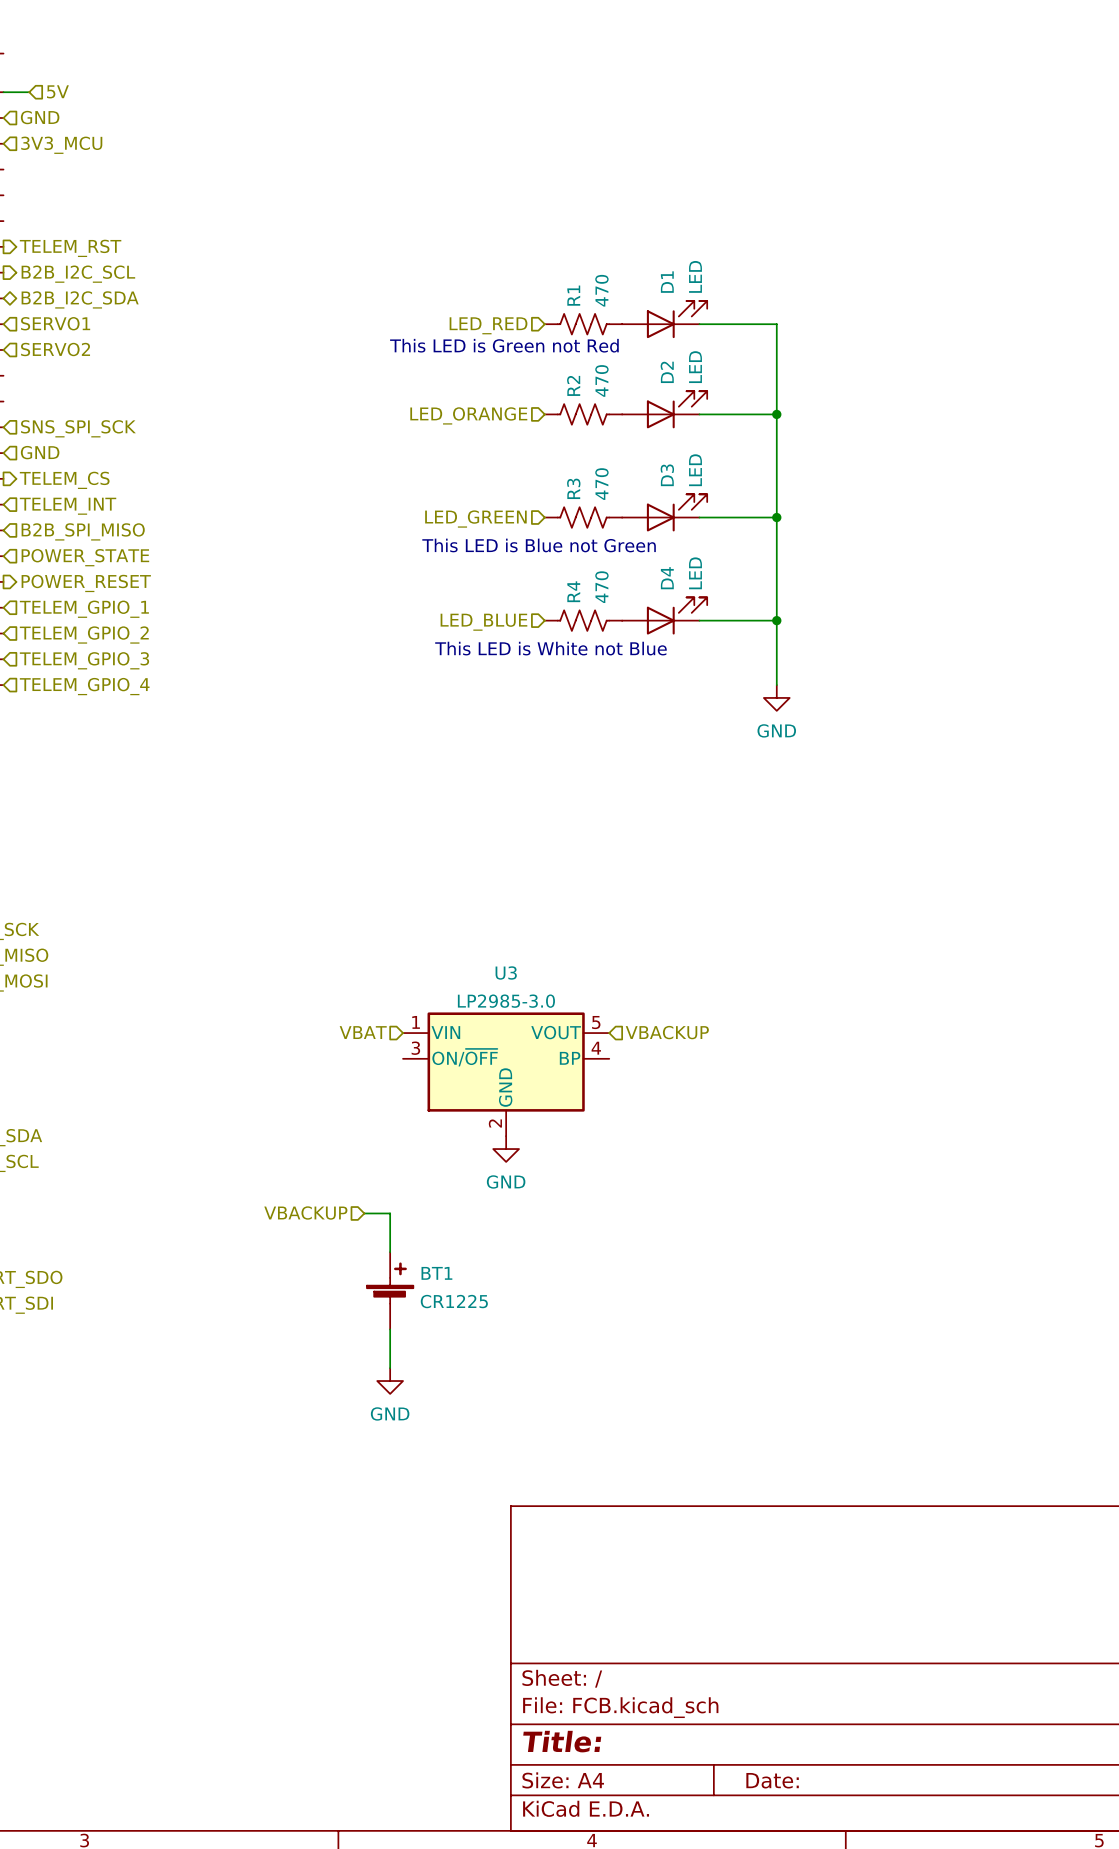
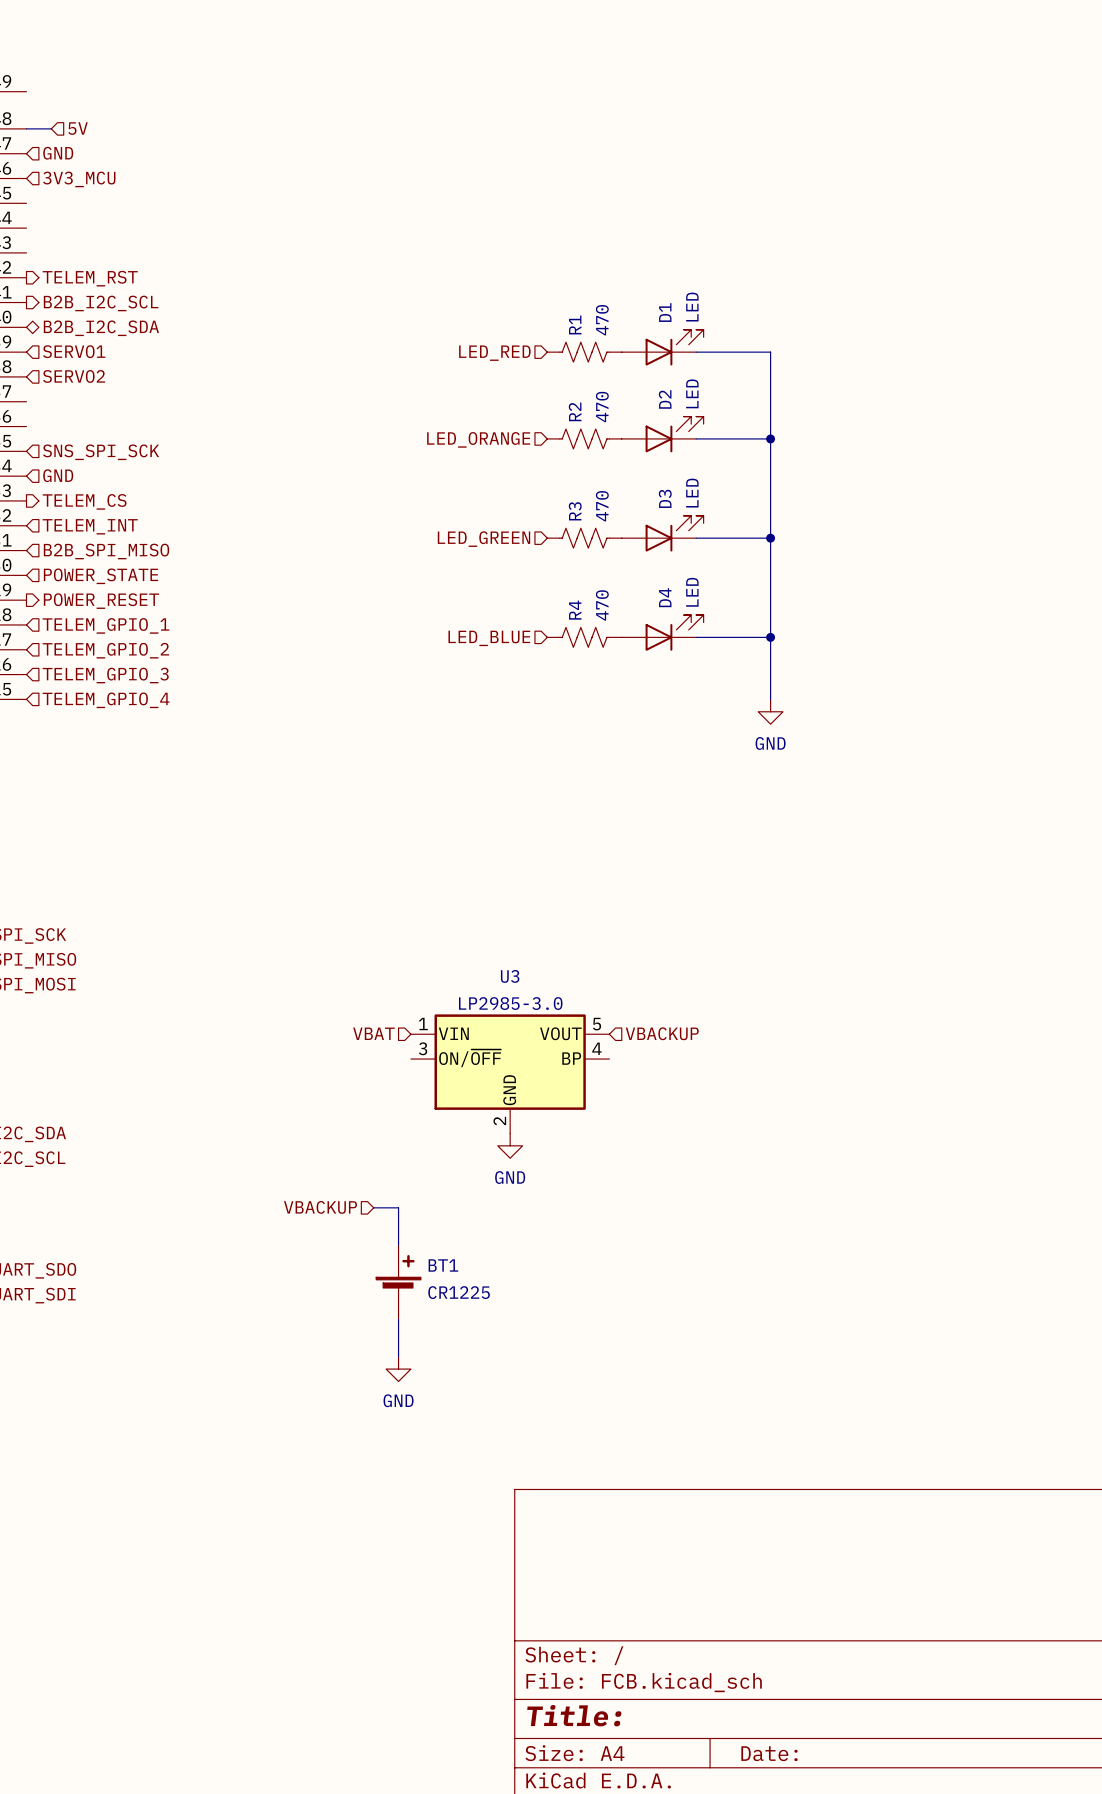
text: This LED is Green not Red (504, 345) -> none
text: This LED is Blue not Green (539, 545) -> none
text: This LED is White not Blue (550, 648) -> none

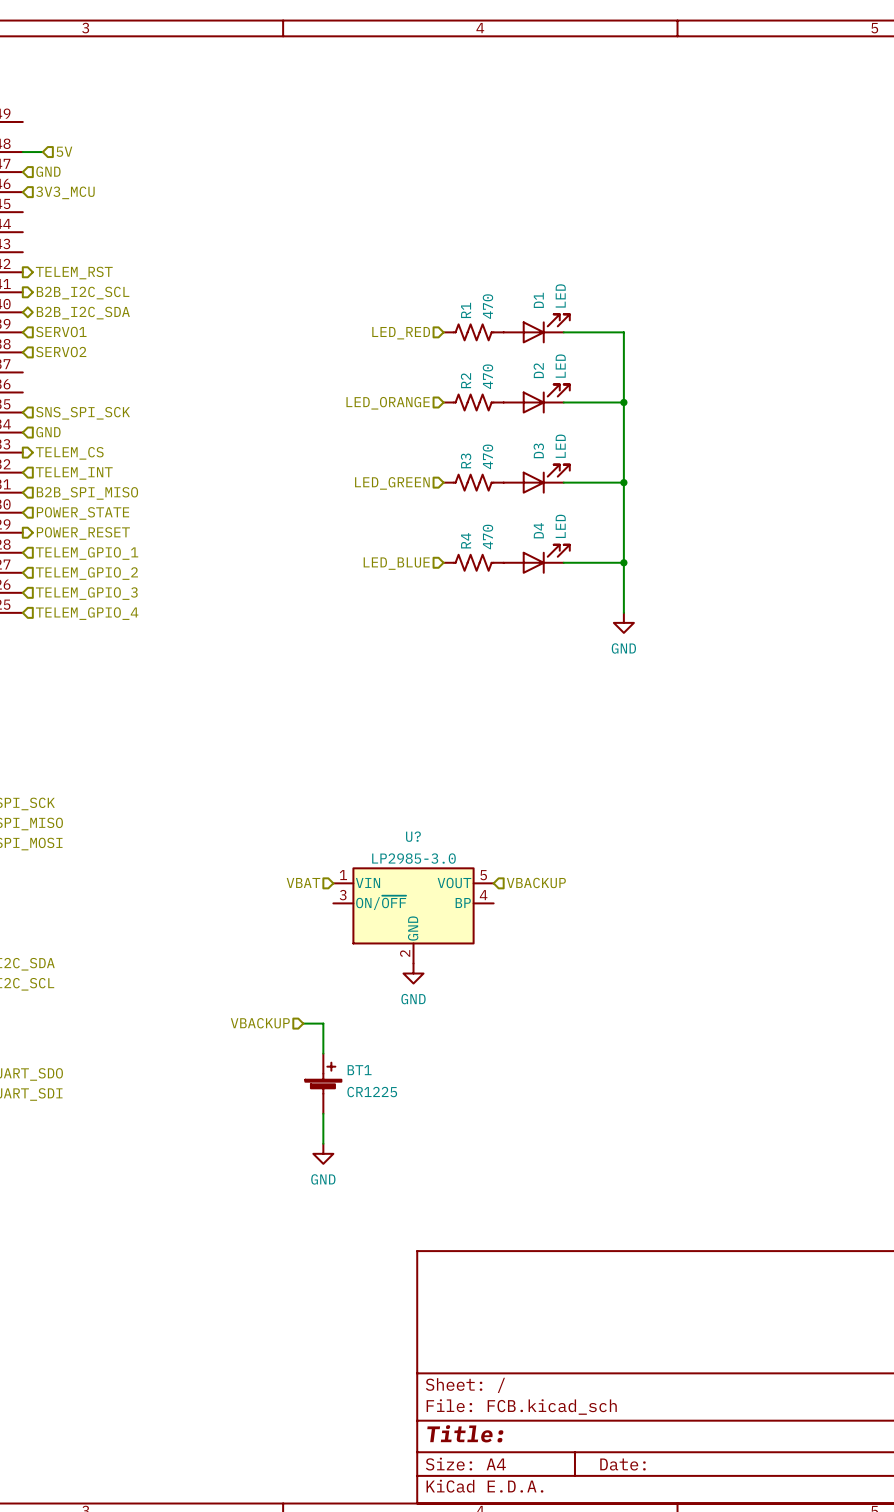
U3 name: U3 (510, 976) -> U? (413, 836)

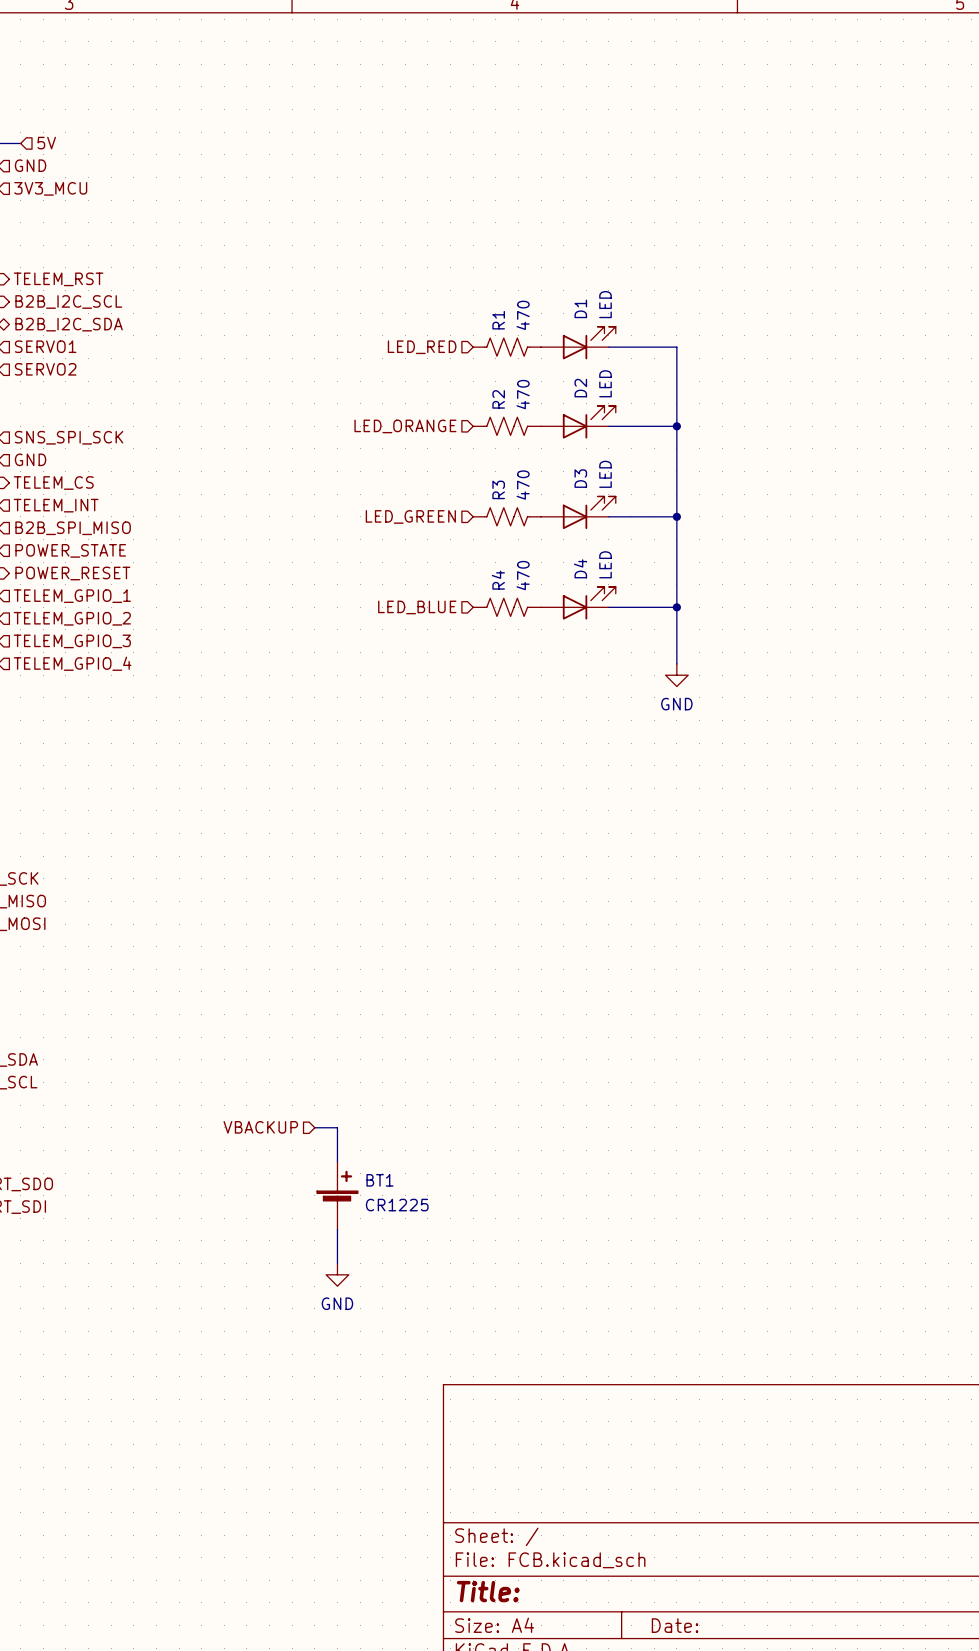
hierarchical label: VBAT (303, 882) -> none
hierarchical label: VBACKUP (536, 882) -> none
U?: LP2985-3.0 (413, 915) -> none
power symbol: GND (413, 973) -> none

